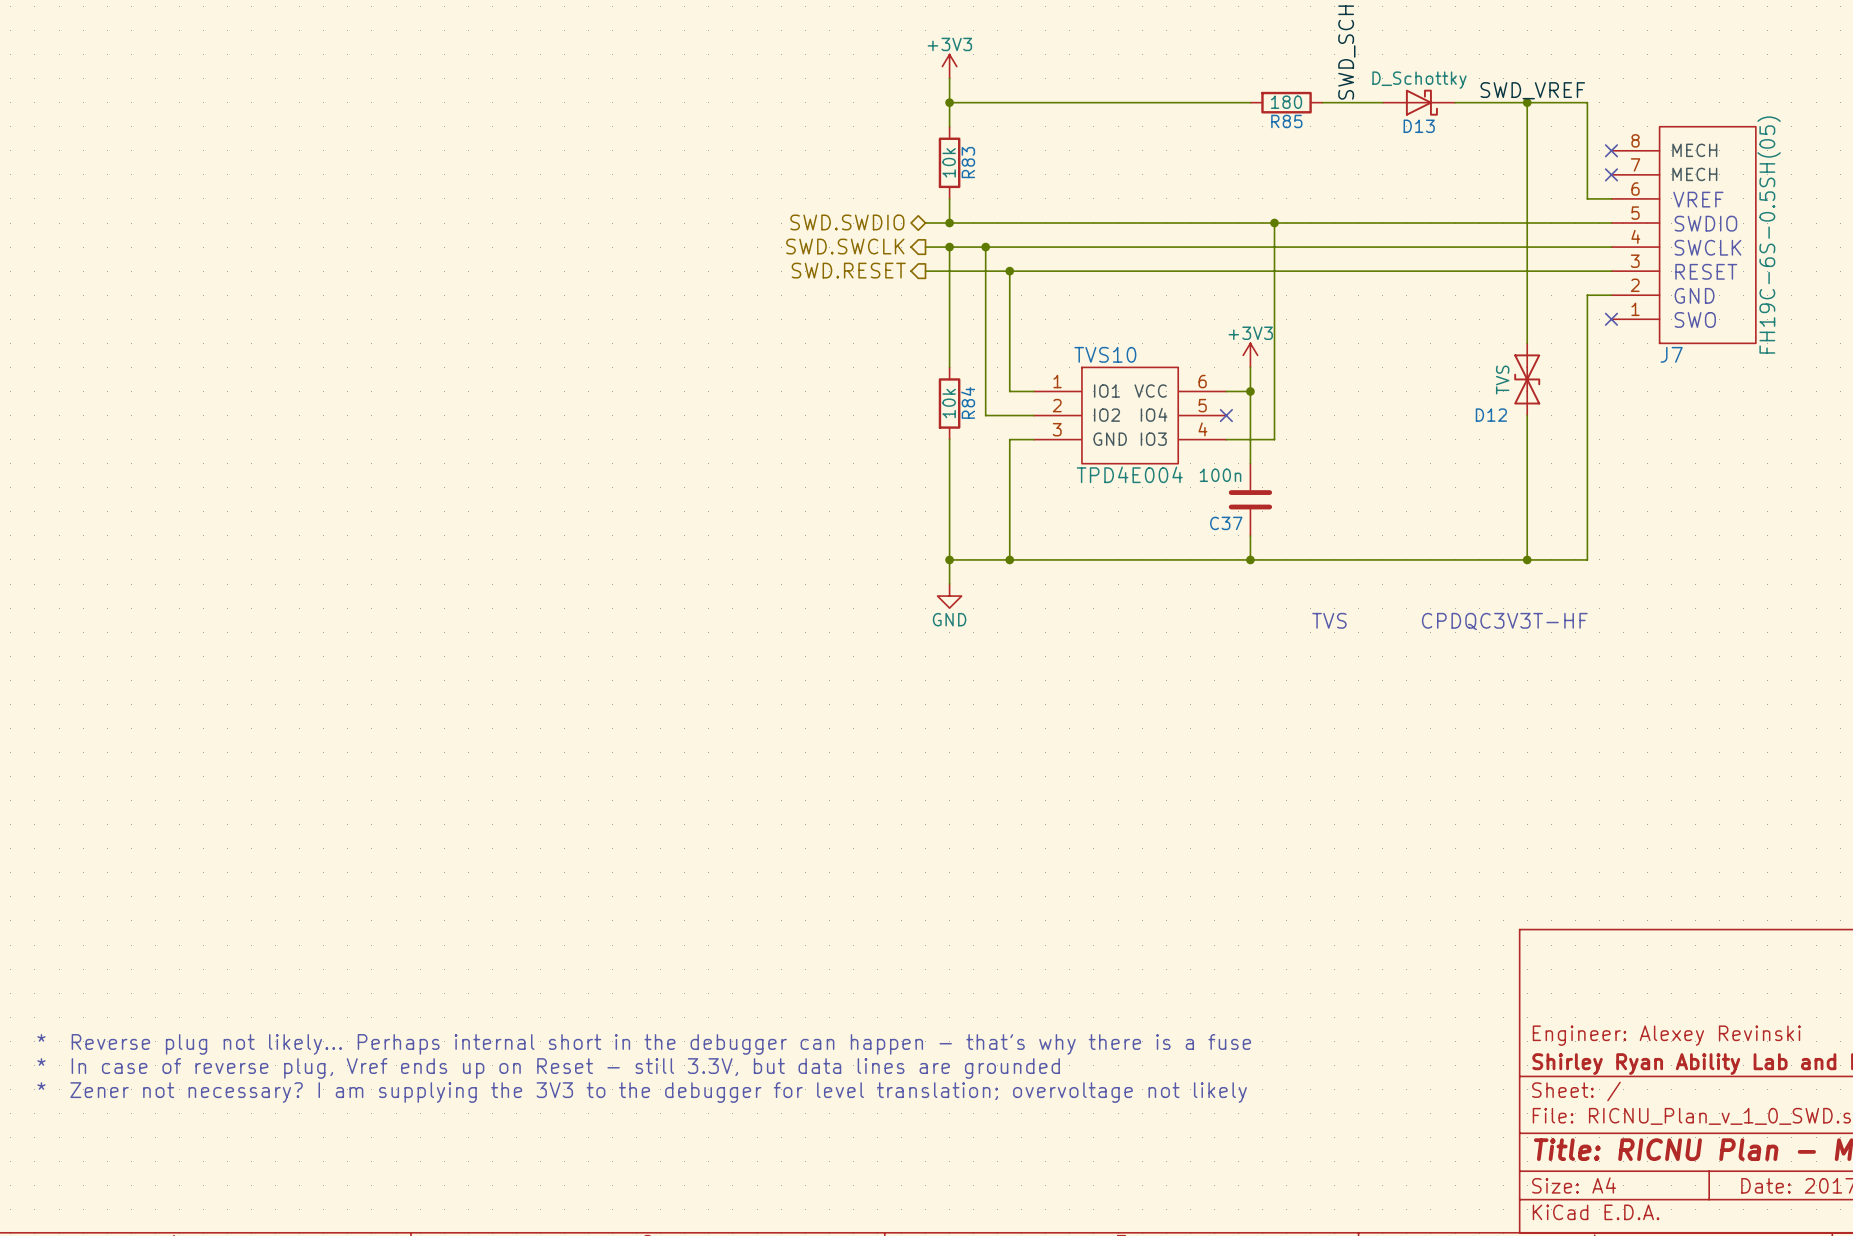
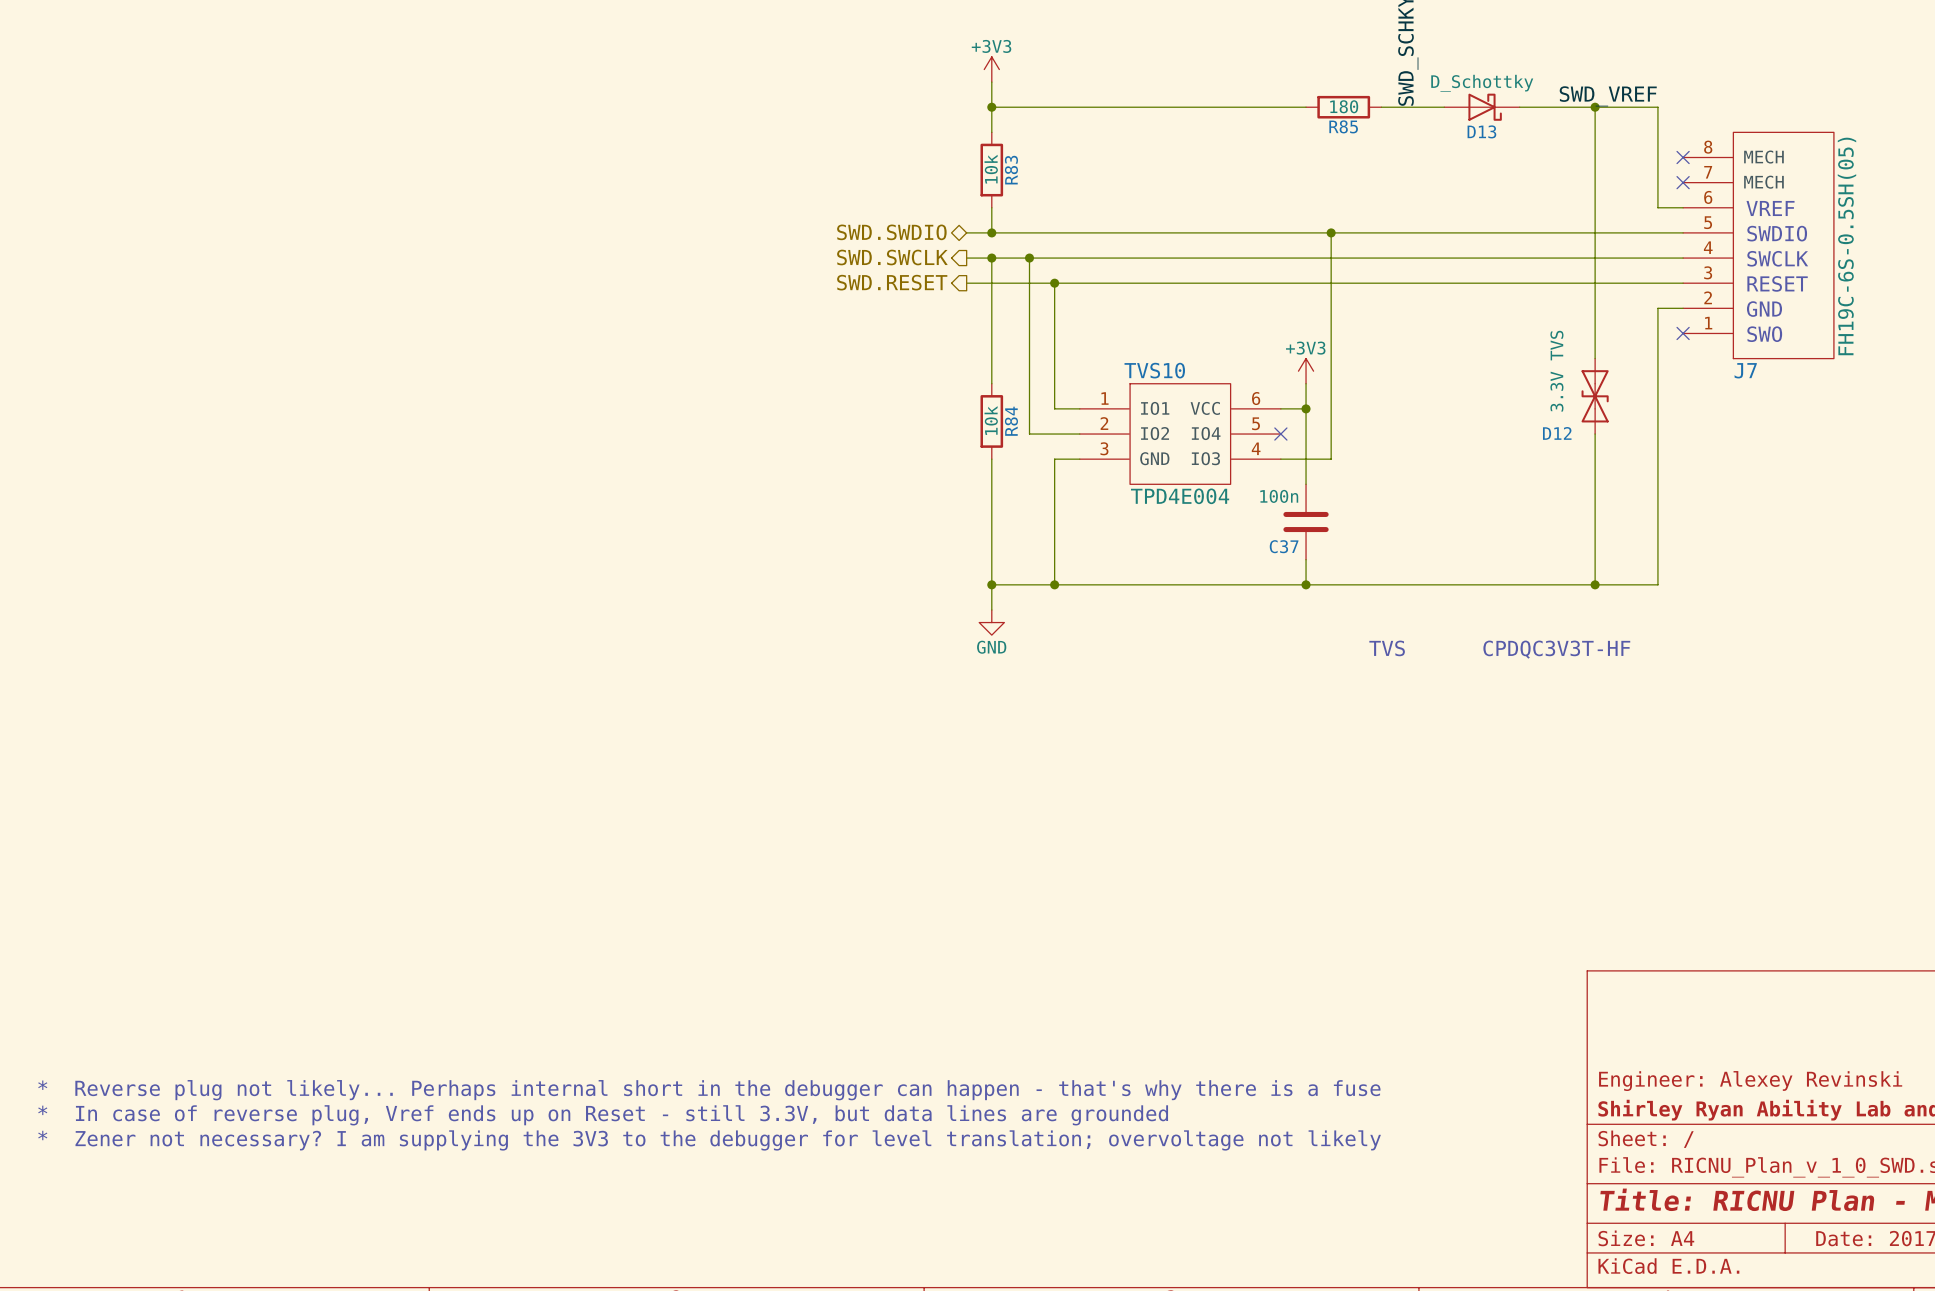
D12 value: TVS (1502, 380) -> 3.3V TVS (1556, 371)

